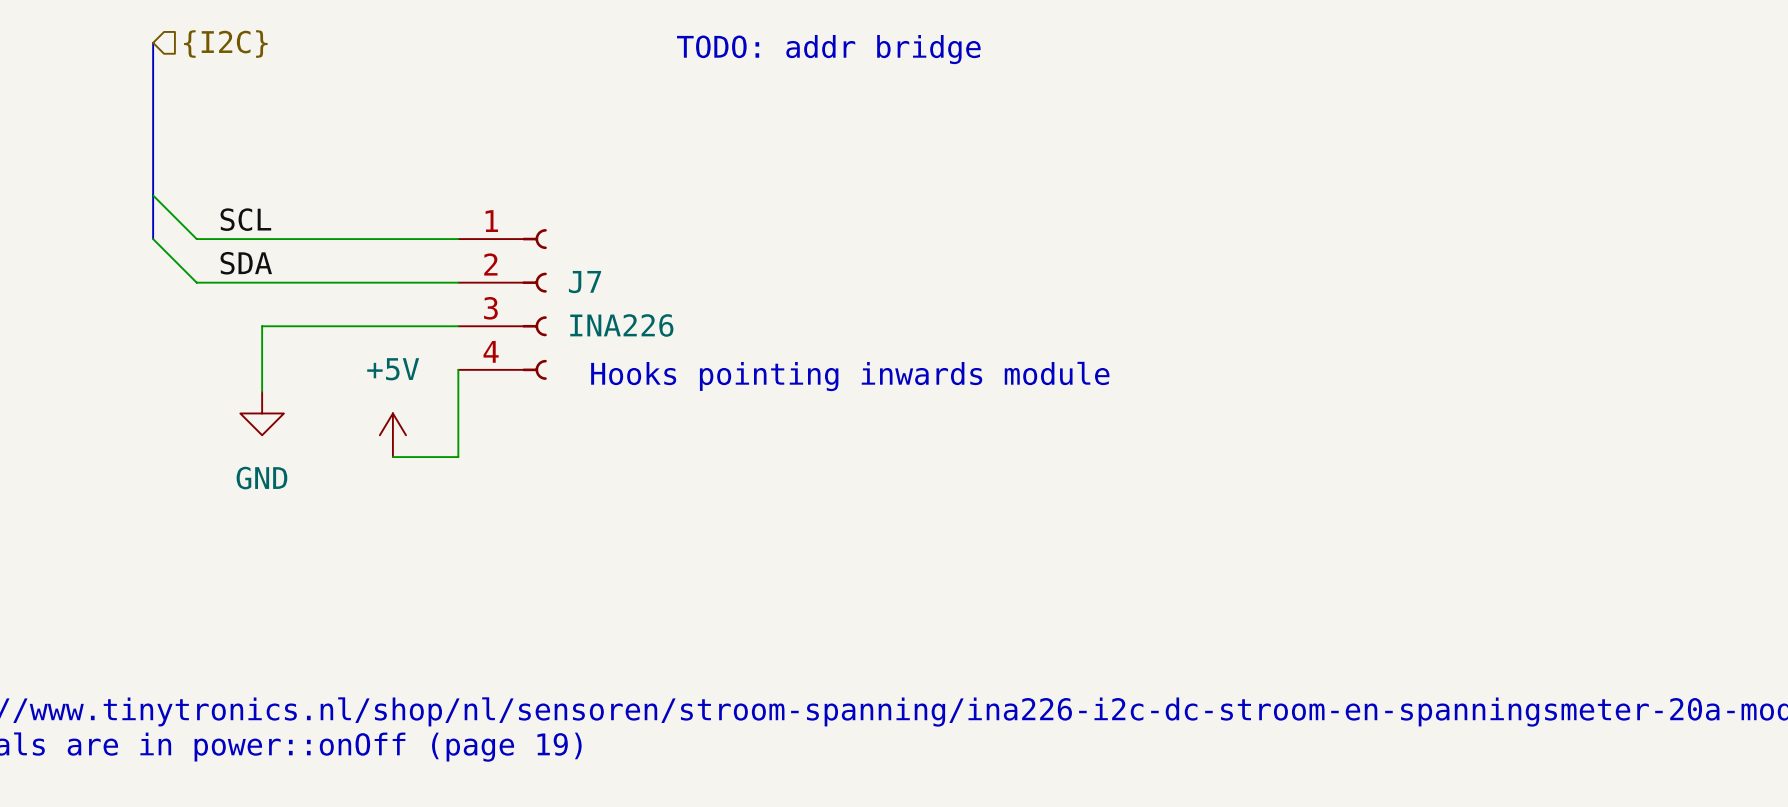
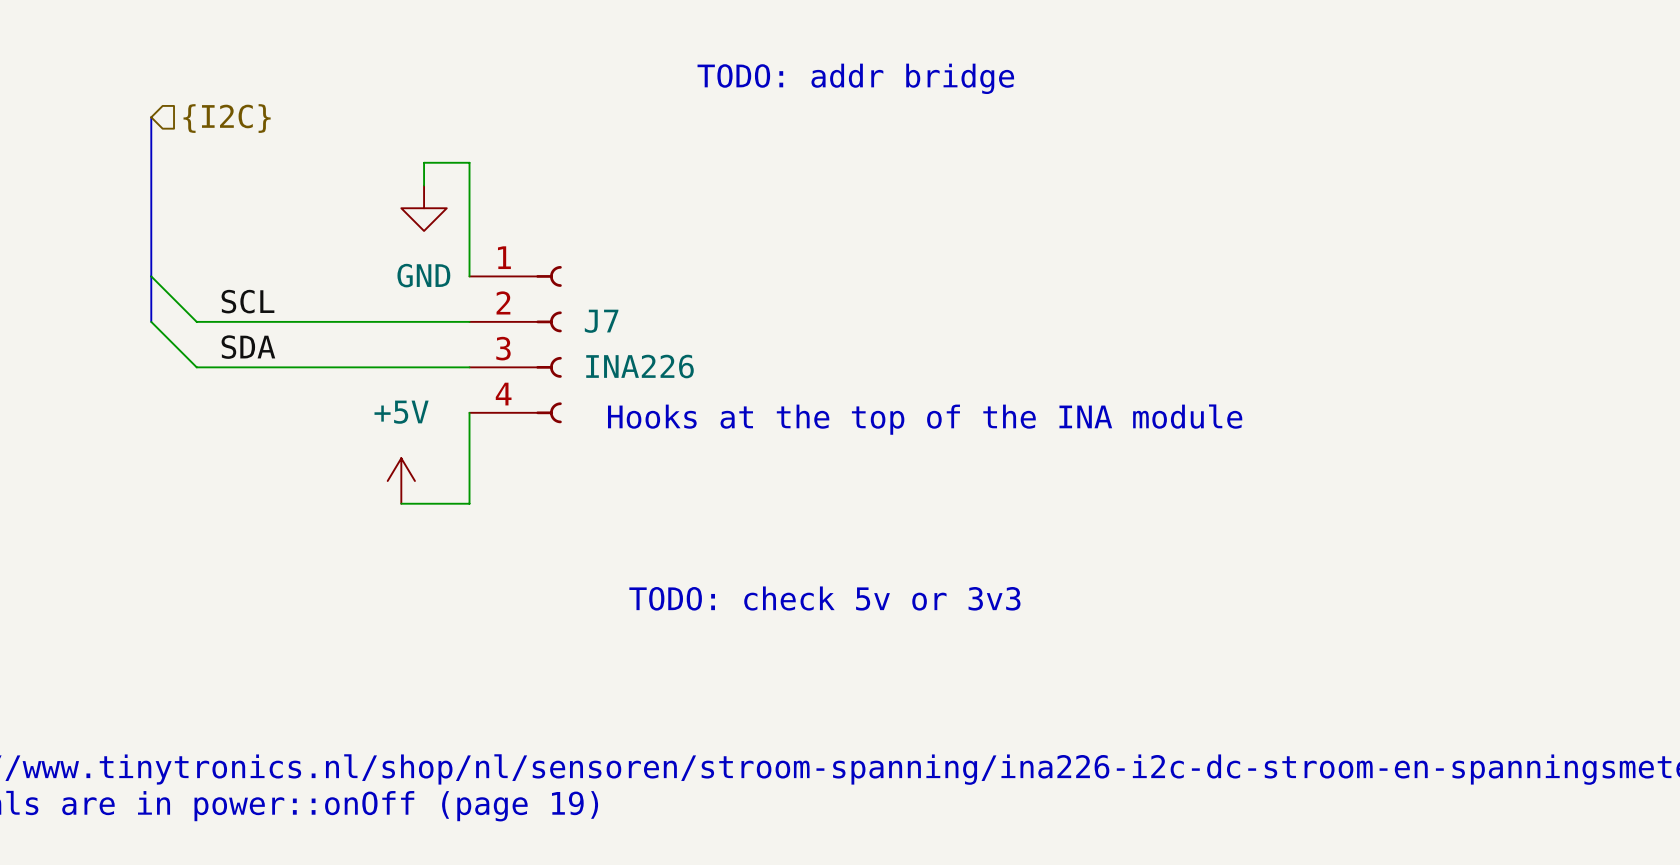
bus: (153, 42) (153, 86) -> (151, 276) (151, 321)
hierarchical label position: {I2C} (225, 44) -> {I2C} (227, 118)
wire: (153, 195) (196, 239) (458, 239) -> (424, 185) (424, 162) (469, 162) (469, 276)
label: SCL (245, 219) -> none
label: SDA (246, 263) -> SCL (247, 301)
label: none -> SDA (248, 347)
wire: (262, 326) (262, 391) -> (264, 367) (196, 367) (151, 321)
text: Hooks pointing inwards module (850, 376) -> Hooks at the top of the INA module (925, 419)
power symbol position: GND (262, 413) -> GND (424, 208)
text: none -> TODO: check 5v or 3v3 (824, 598)

